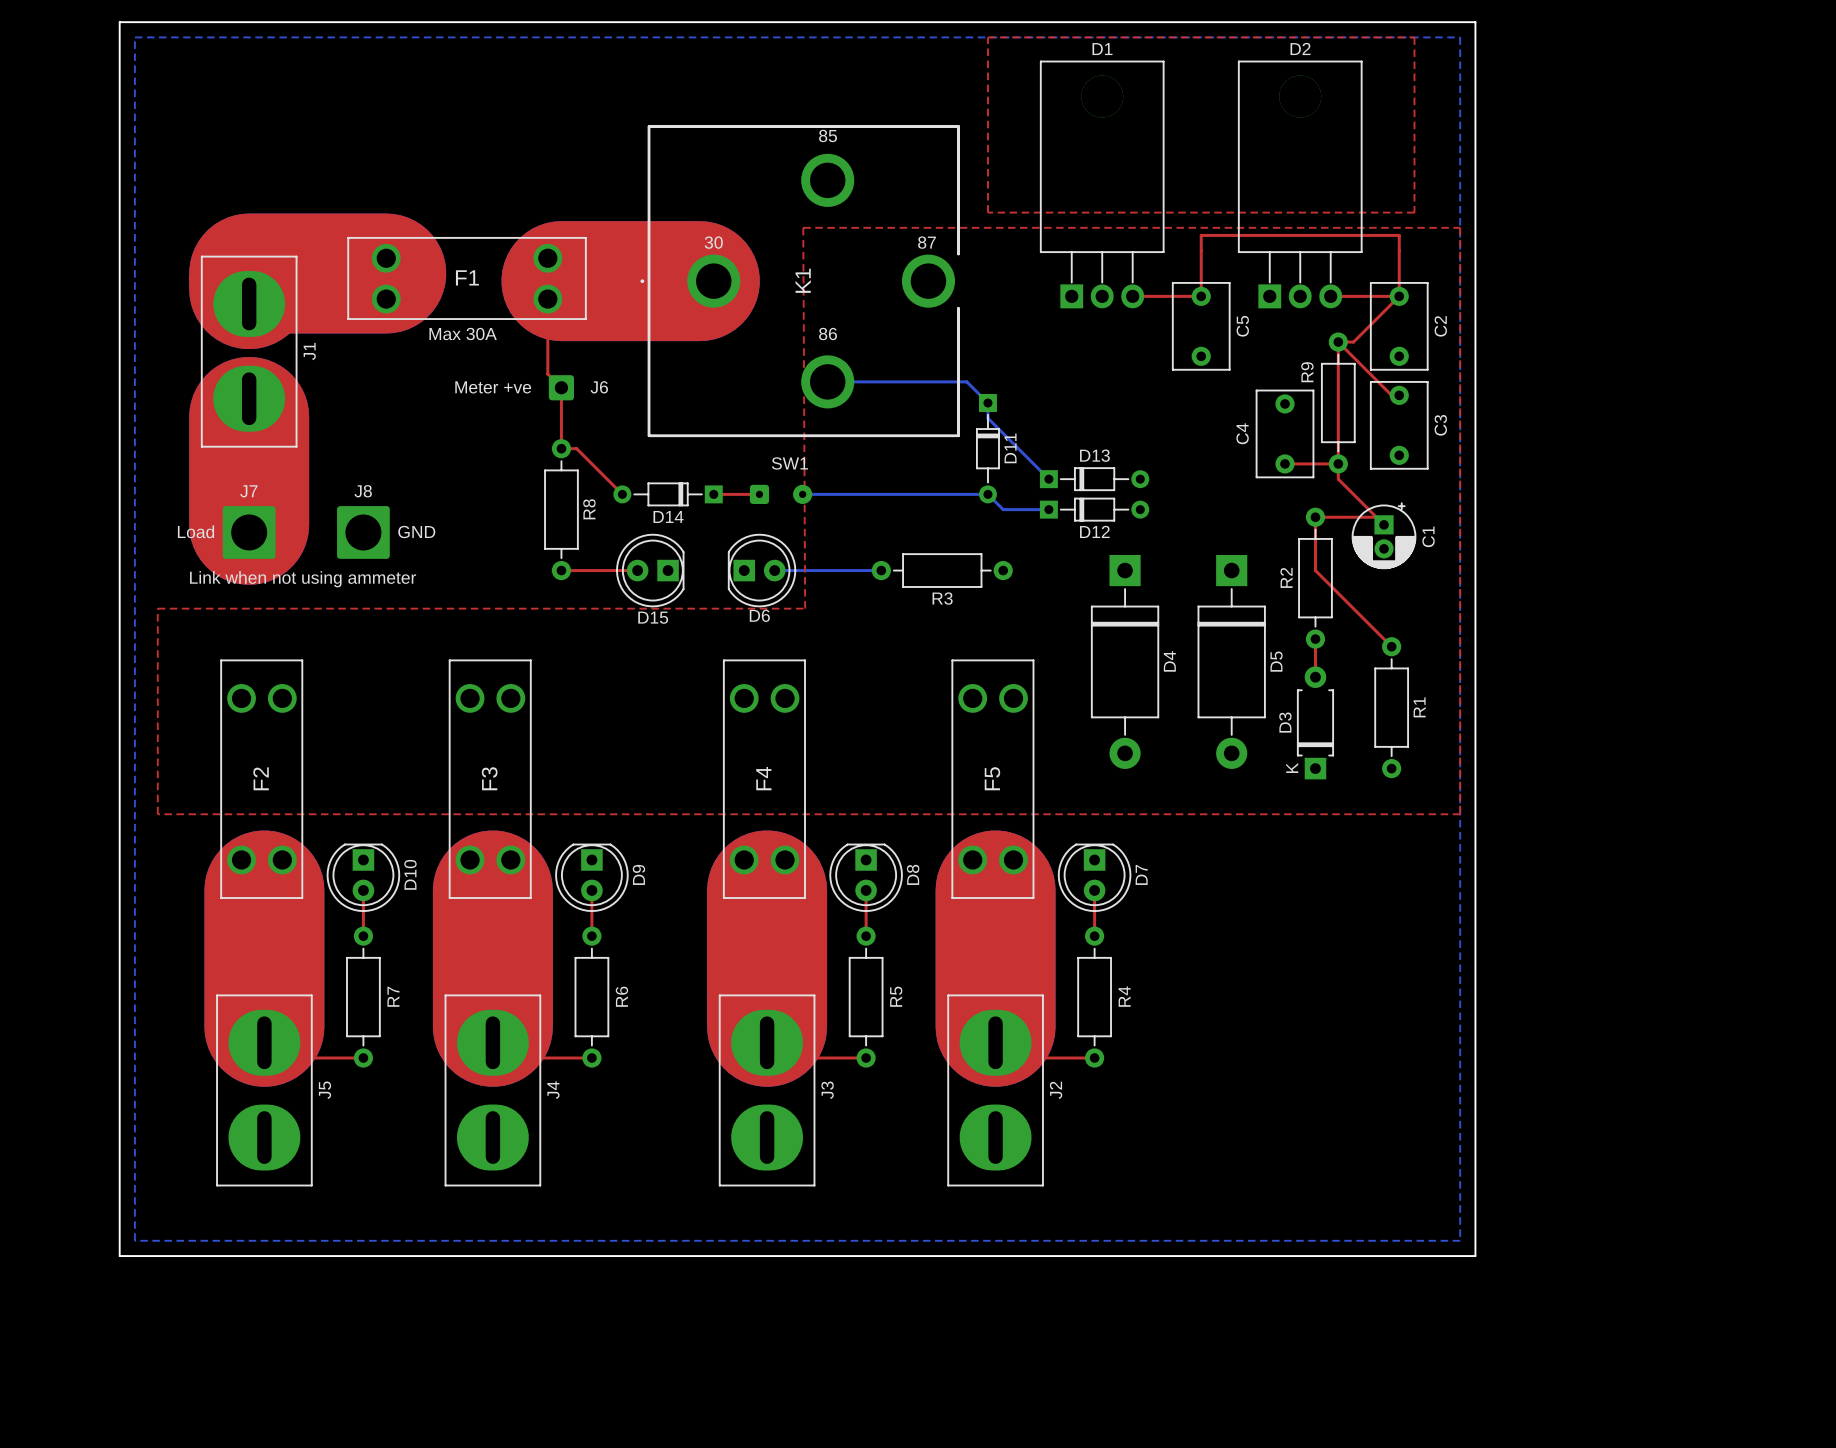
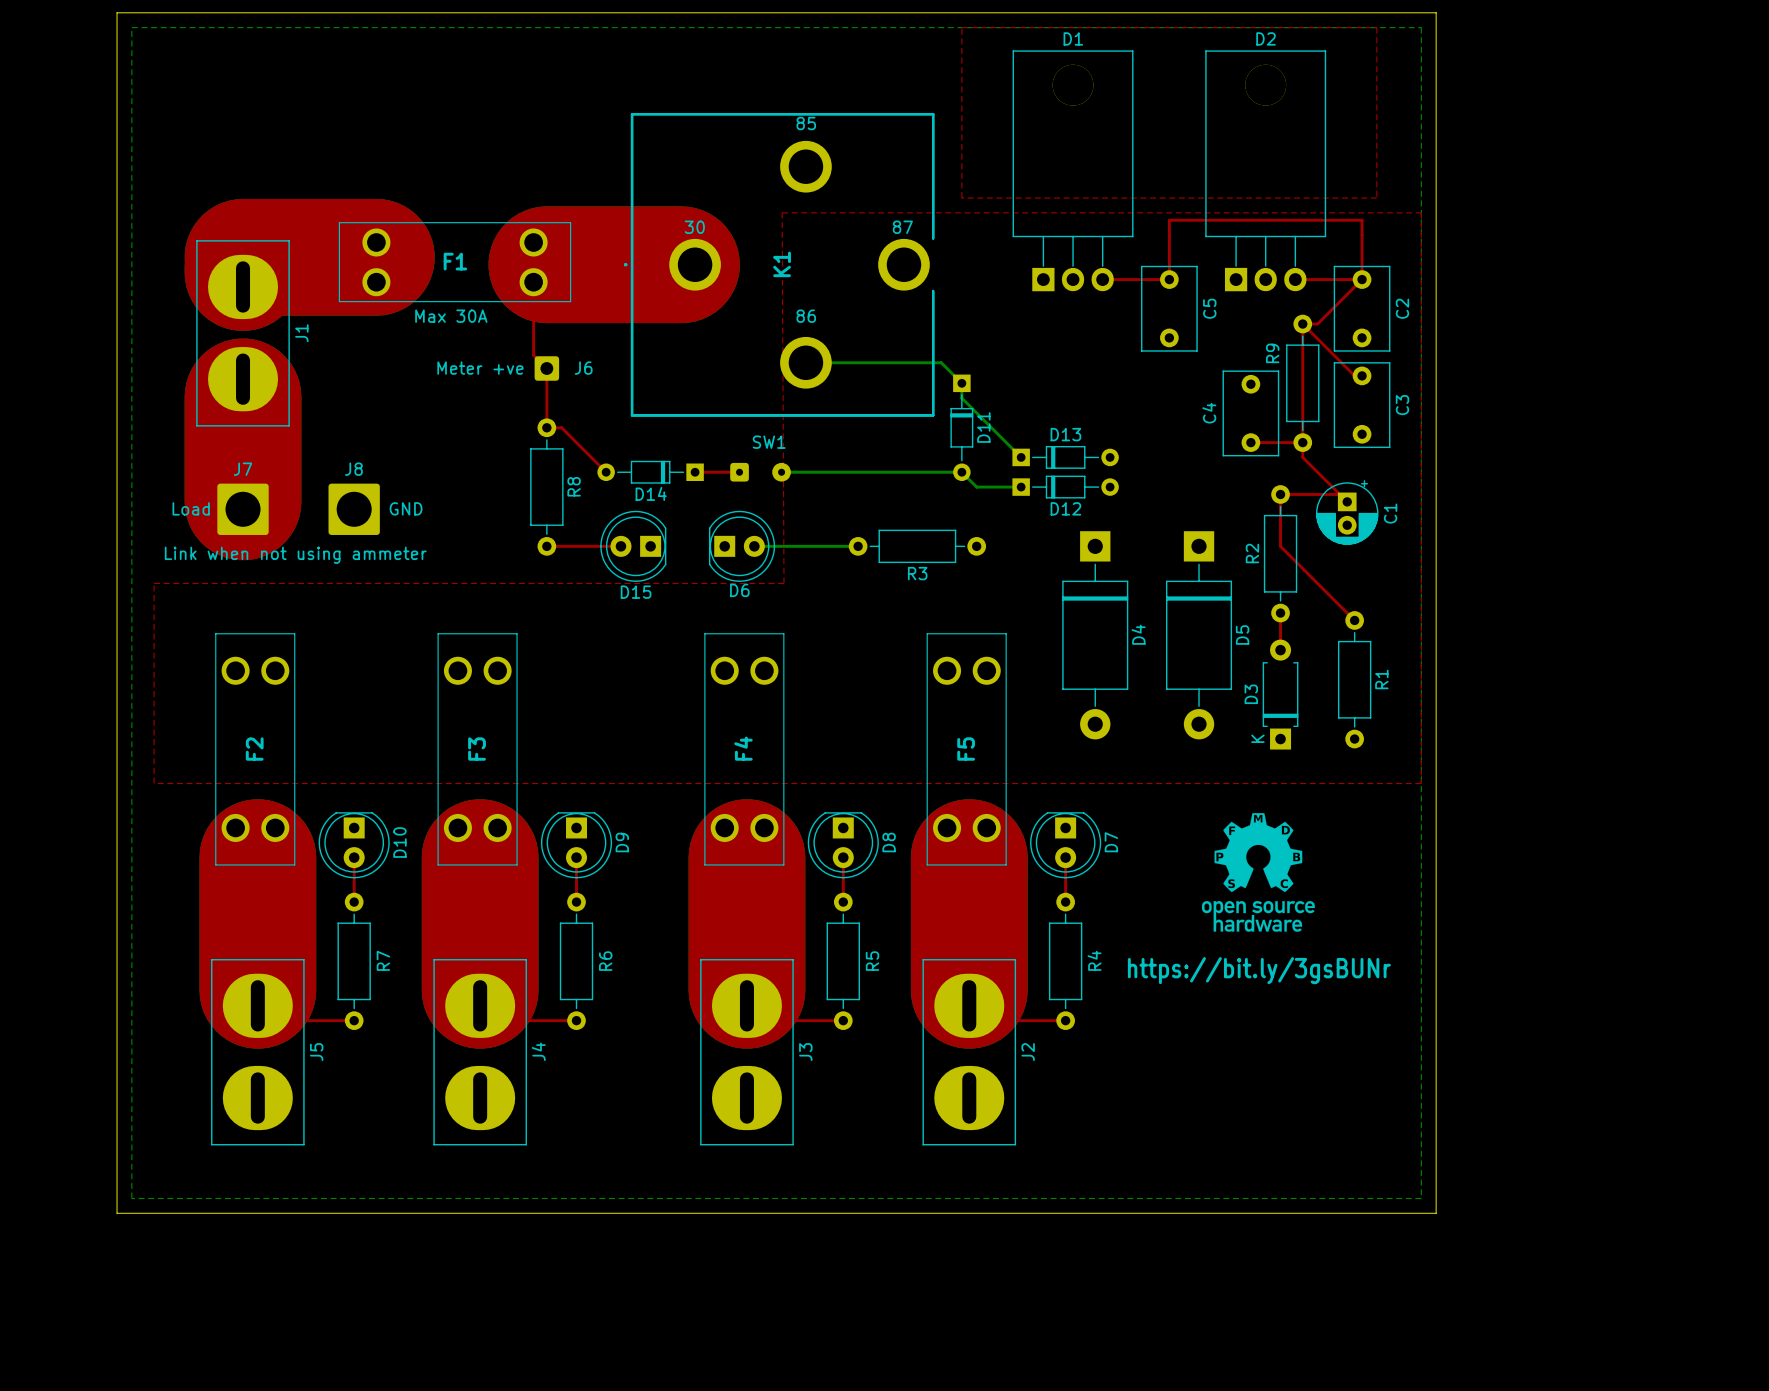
drawing: none -> [1201, 813, 1315, 932]
text: none -> https://bit.ly/3gsBUNr (1259, 970)

